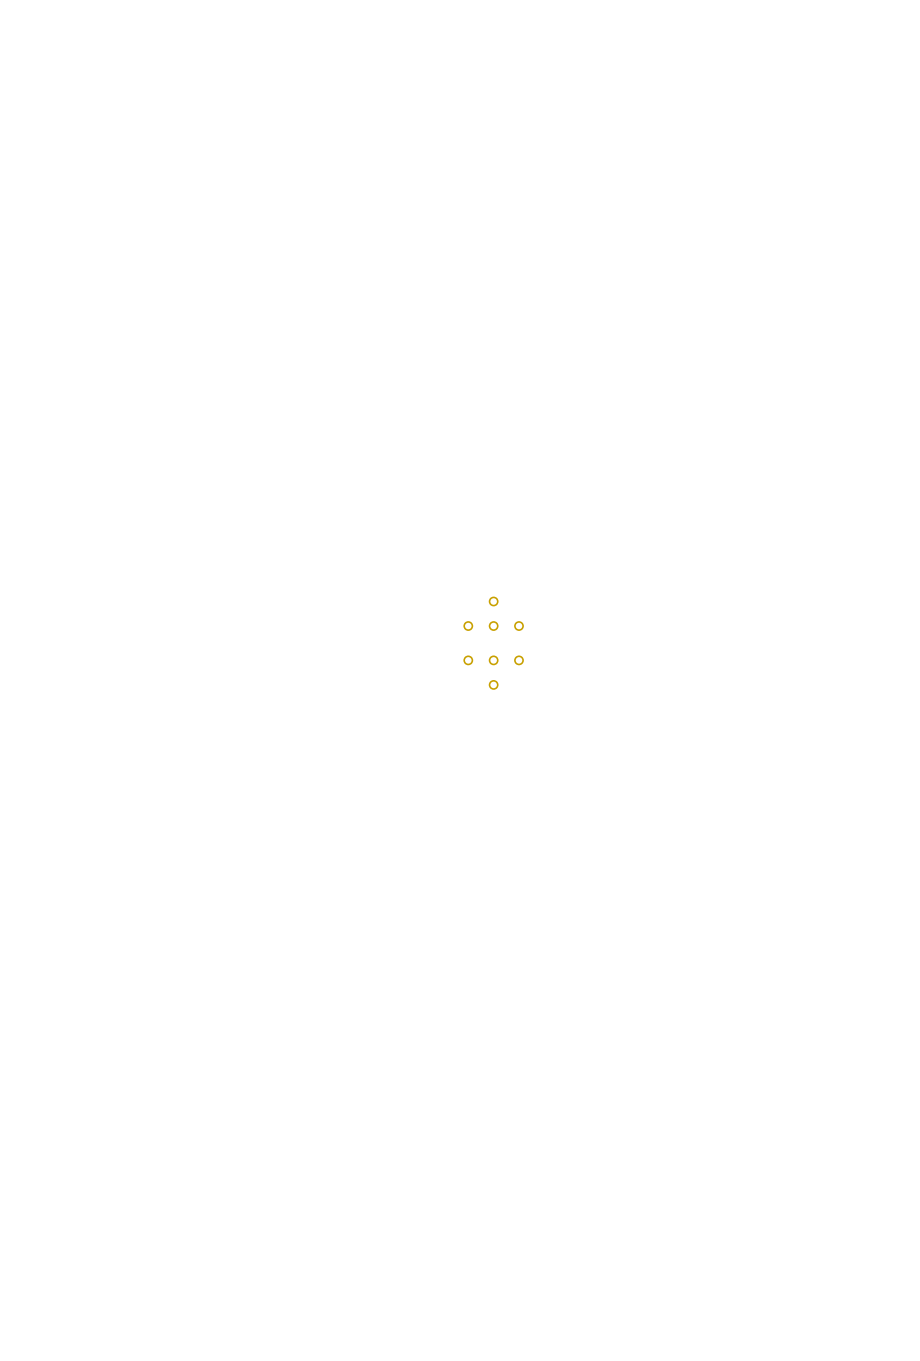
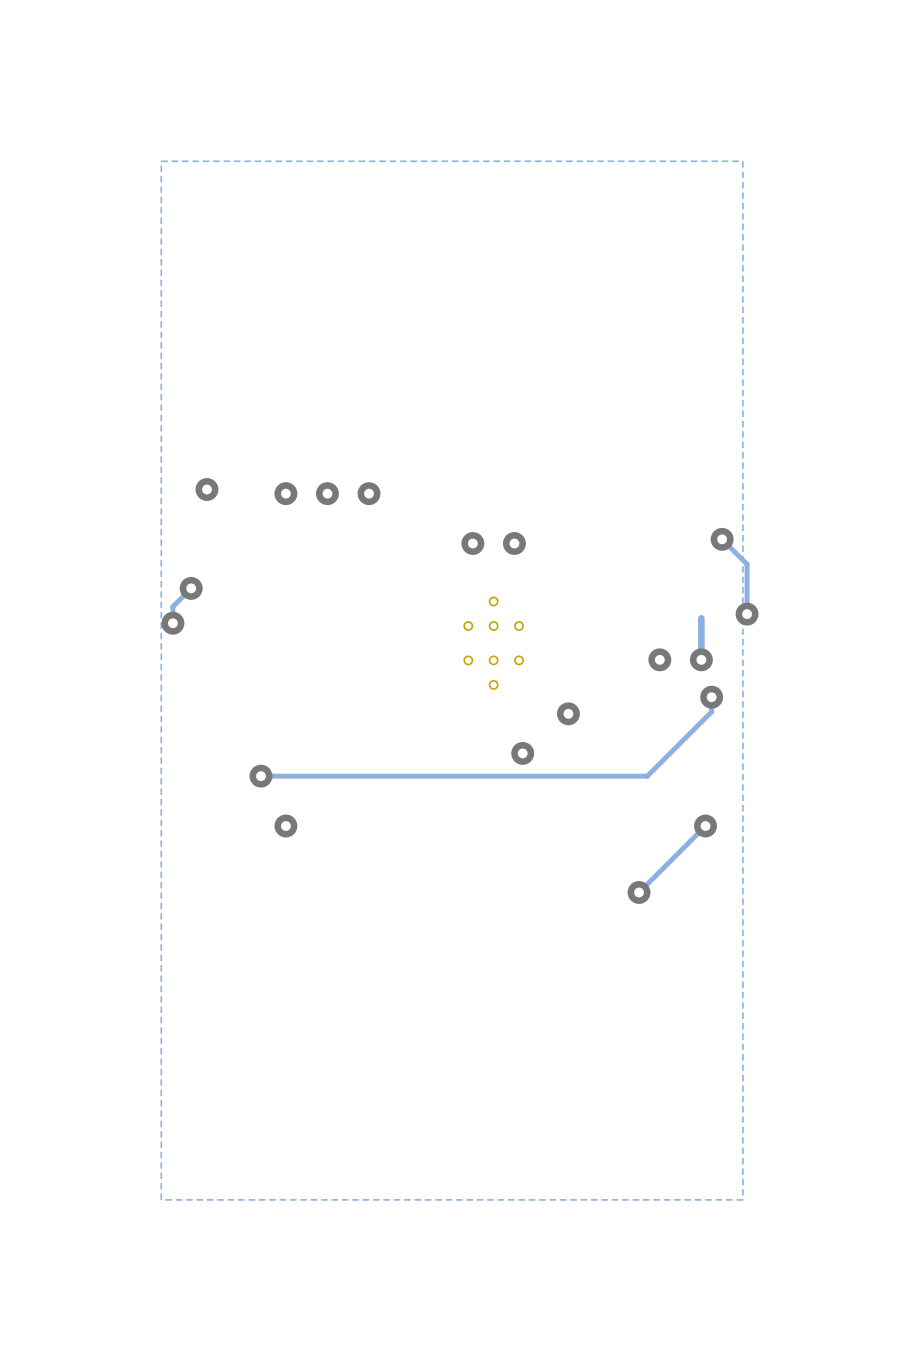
zone outline: none -> (742, 161) (742, 1199) (161, 1199) (161, 161) (742, 161)
via: none -> (206, 489)
via: none -> (285, 493)
via: none -> (327, 493)
via: none -> (369, 493)
track: none -> (722, 539) (747, 564) (747, 614)
via: none -> (722, 539)
via: none -> (472, 543)
via: none -> (514, 543)
track: none -> (191, 588) (172, 606) (172, 623)
via: none -> (191, 588)
via: none -> (747, 614)
track: none -> (701, 618) (701, 659)
via: none -> (172, 623)
via: none -> (659, 659)
via: none -> (701, 659)
track: none -> (711, 697) (711, 711) (647, 776) (260, 776)
via: none -> (711, 697)
via: none -> (568, 713)
via: none -> (522, 753)
via: none -> (260, 776)
via: none -> (285, 826)
track: none -> (705, 826) (639, 892)
via: none -> (705, 826)
via: none -> (639, 892)

